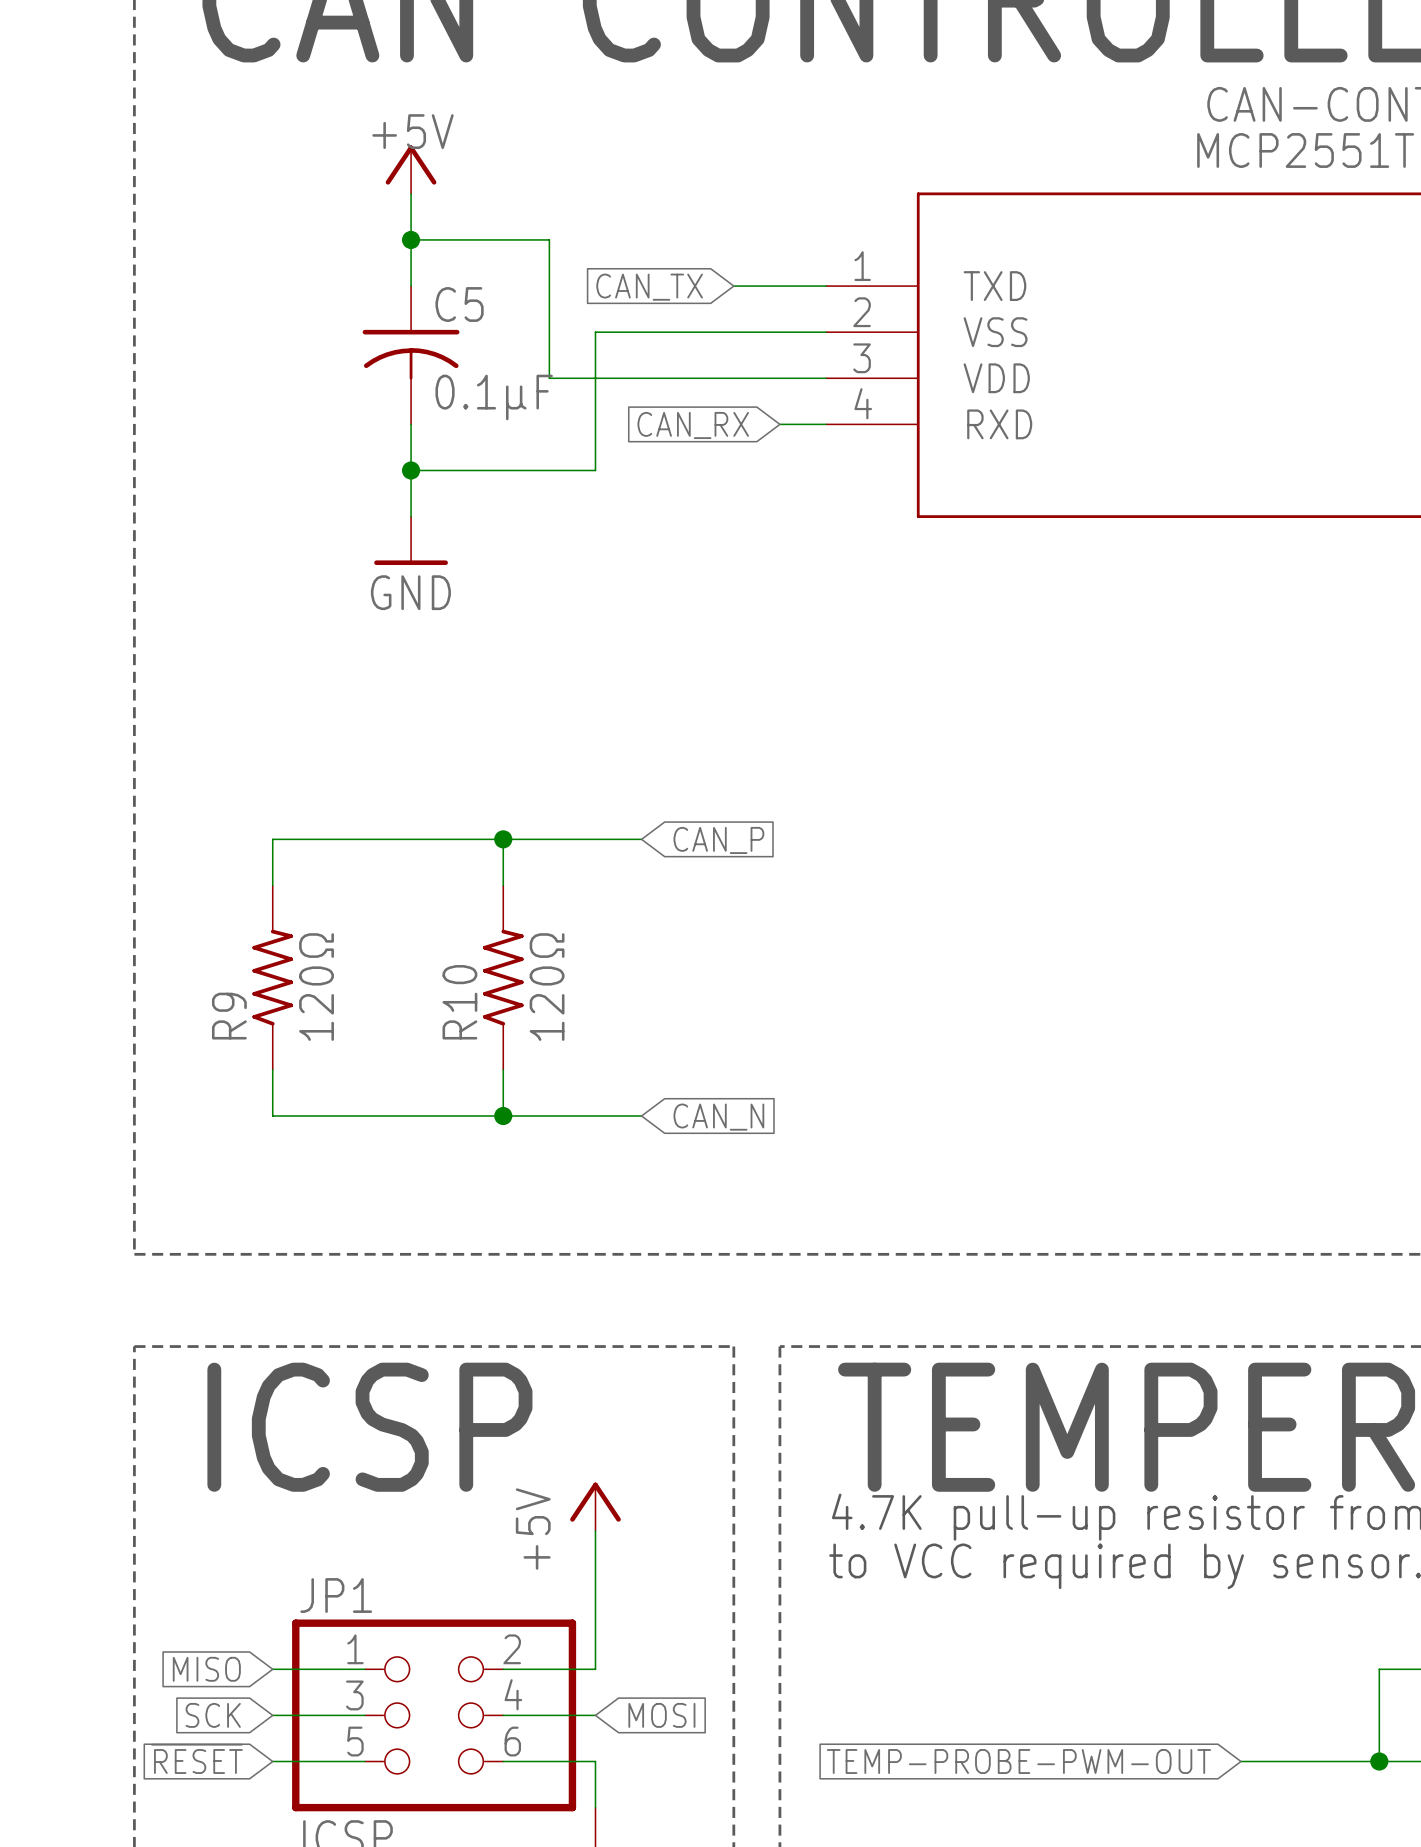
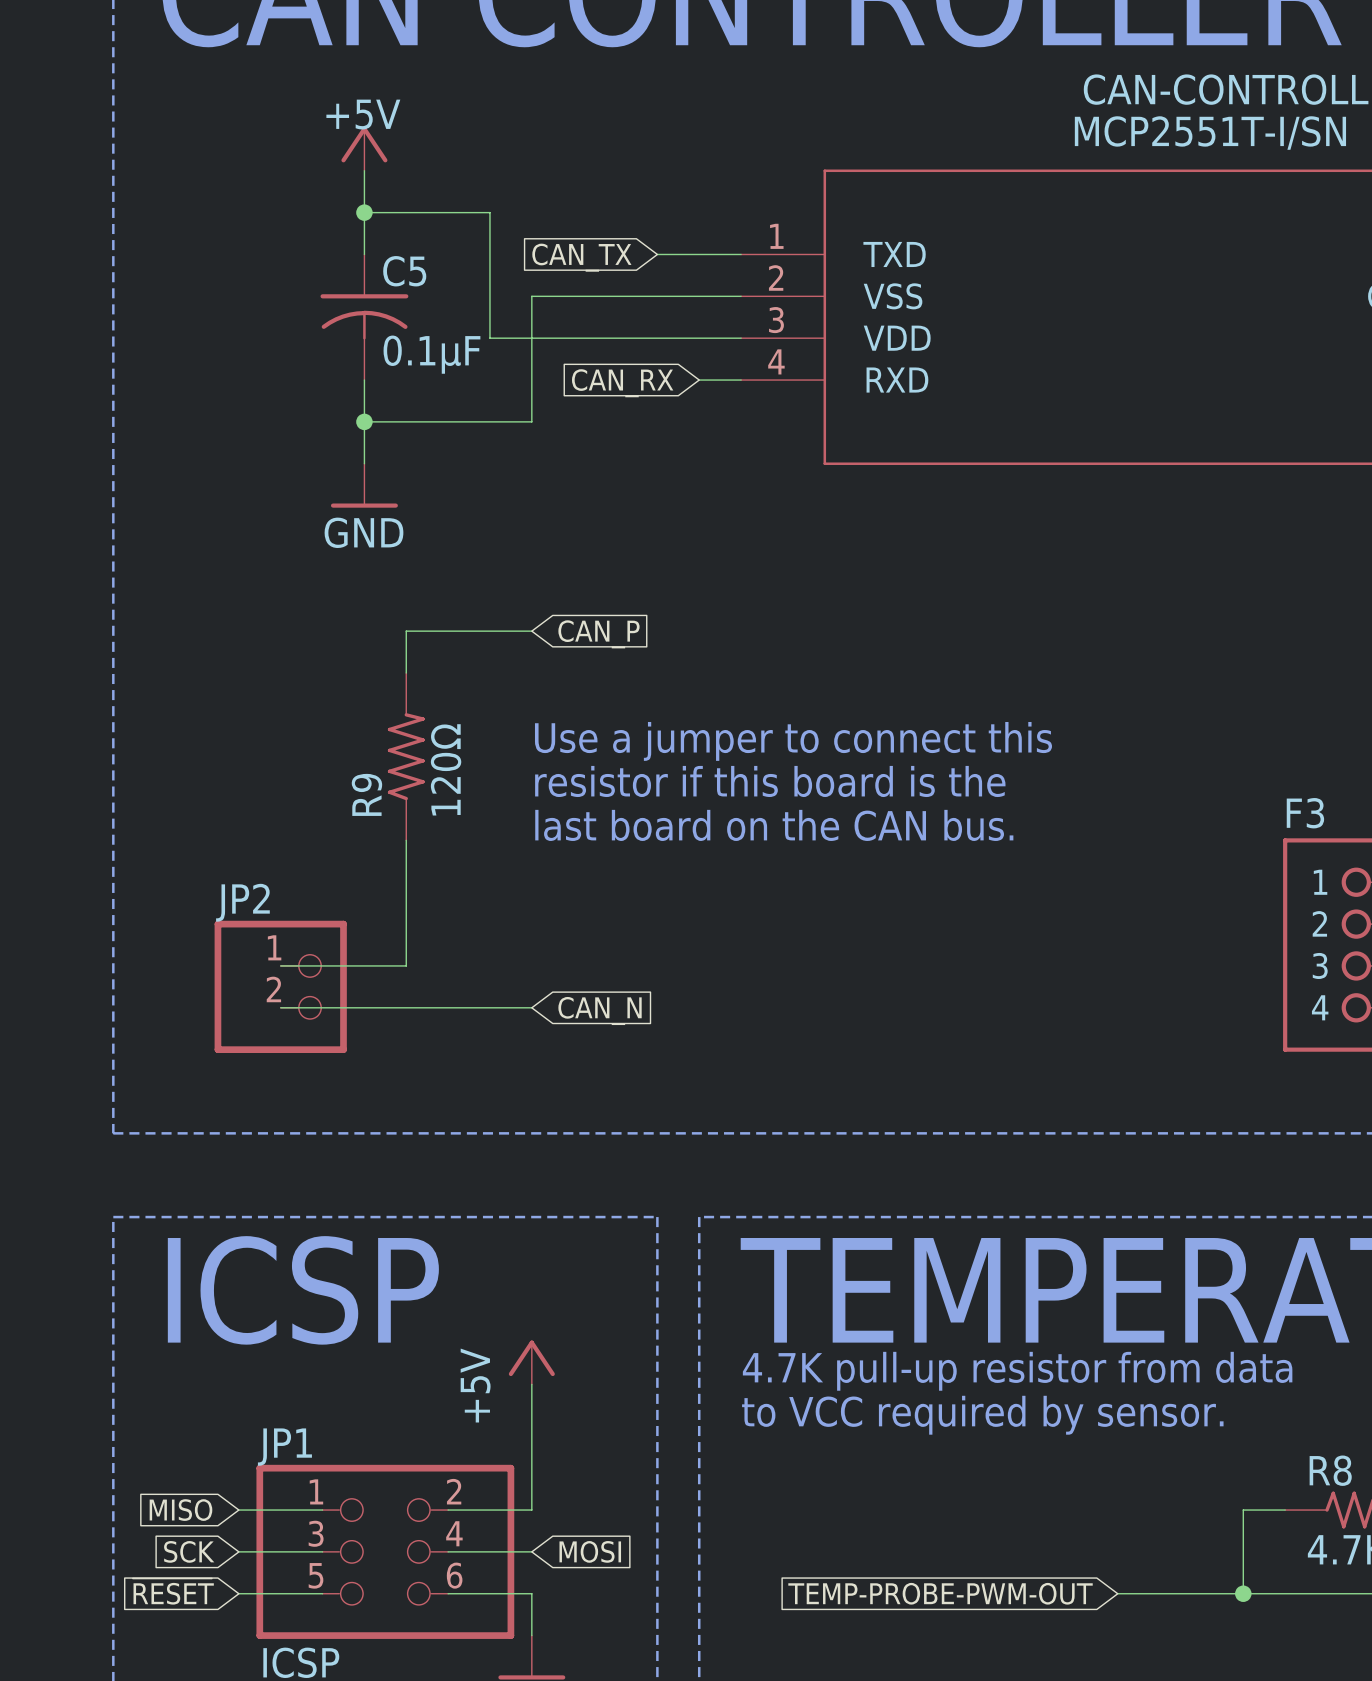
wire: none -> (531, 631) (406, 631) (406, 672)
text: none -> Use a jumper to connect this (793, 741)
wire: (503, 839) (503, 885) -> none
junction: (503, 839) -> none
wire: (641, 839) (272, 839) (272, 885) -> none
global label position: CAN_P (718, 840) -> CAN_P (598, 634)
text: none -> resistor if this board is the (770, 781)
text: none -> last board on the CAN bus. (774, 825)
wire: none -> (406, 840) (406, 965) (280, 965)
R9 position: (272, 977) -> (406, 756)
R10: 120Ω (503, 977) -> none
wire: (272, 1069) (272, 1116) (318, 1116) -> none
wire: (503, 1069) (503, 1116) -> none
JP2: none -> (280, 986)
junction: (503, 1116) -> none
wire: (595, 1116) (641, 1116) -> none
global label position: CAN_N (718, 1117) -> CAN_N (600, 1011)

